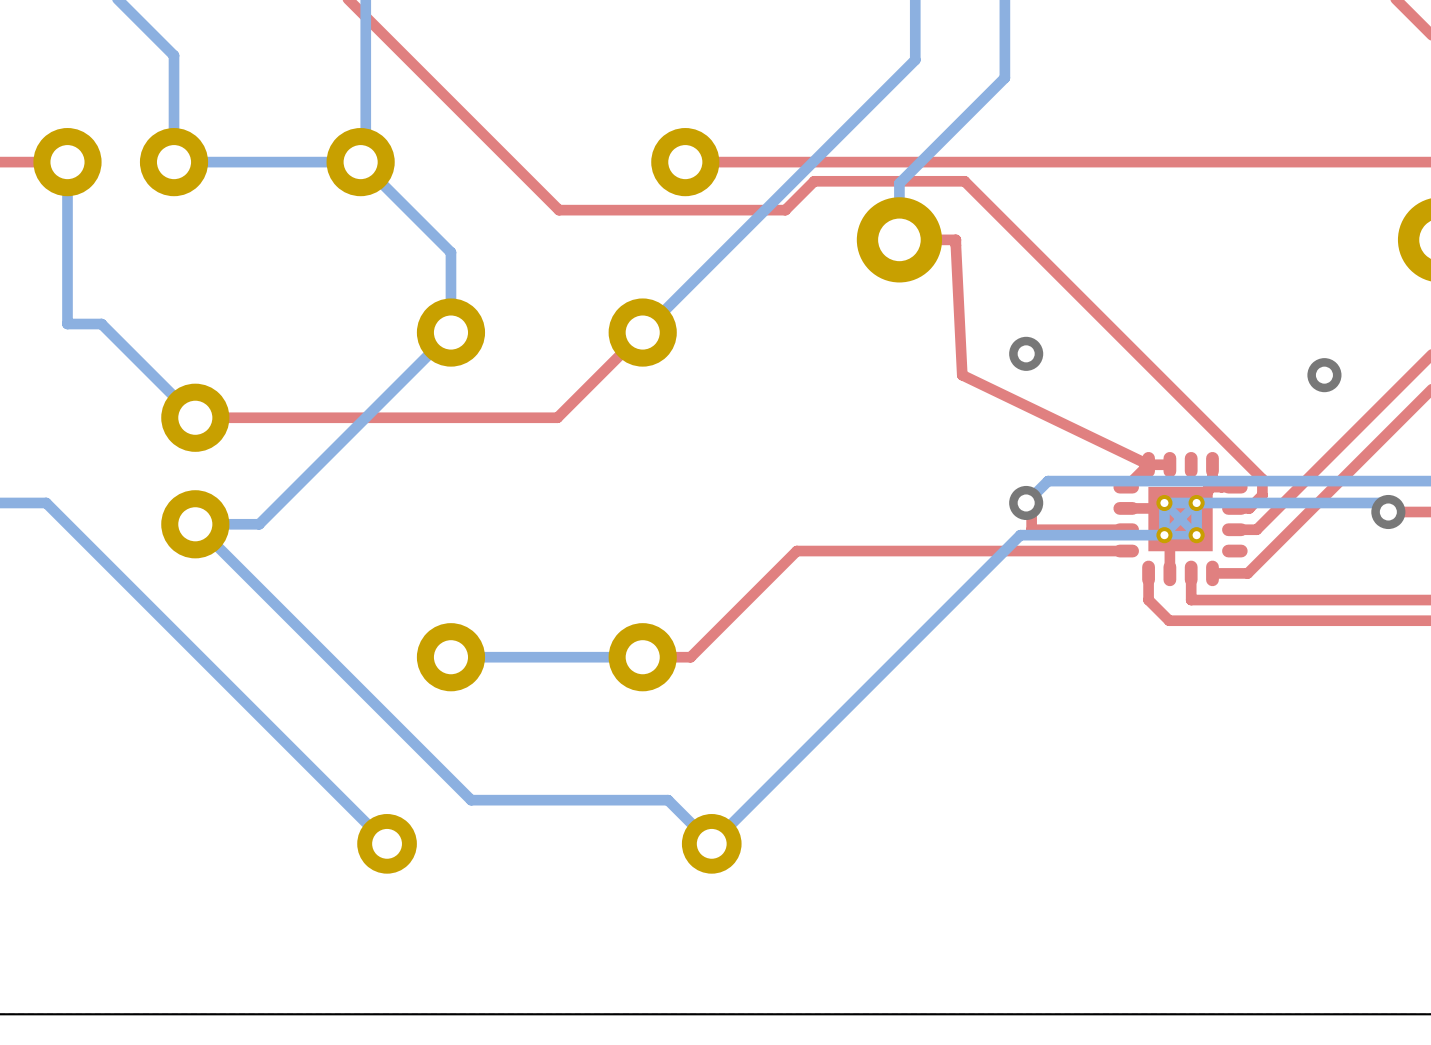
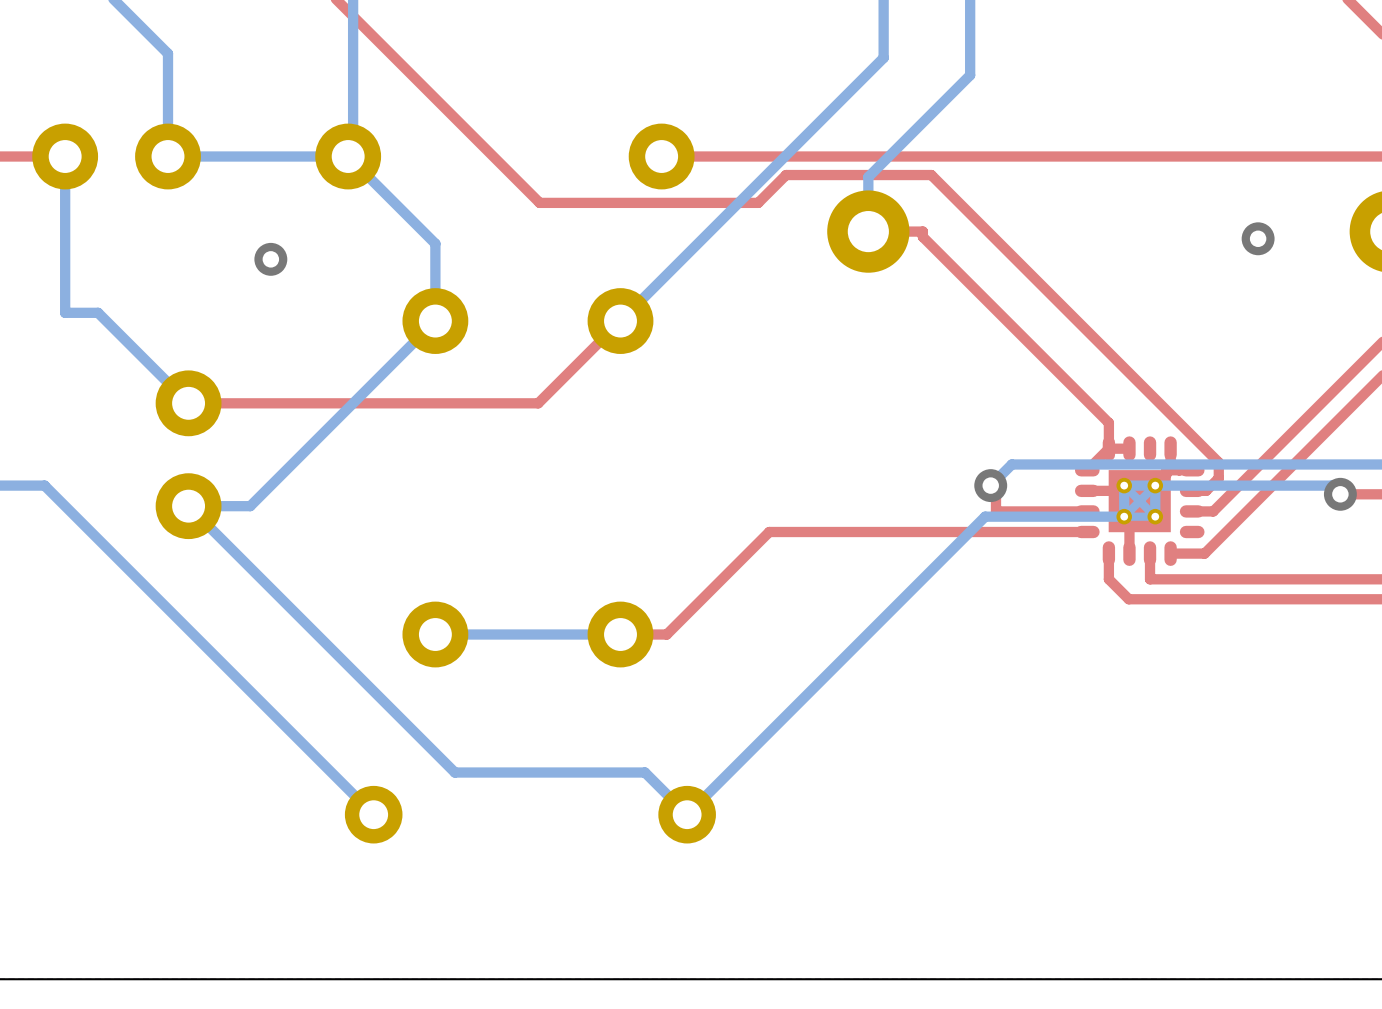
top track: (955, 245) (962, 375) (1148, 464) -> (922, 236) (1108, 422) (1108, 448)
via: none -> (270, 259)
via: (1026, 353) -> none
via position: (1324, 375) -> (1258, 238)

